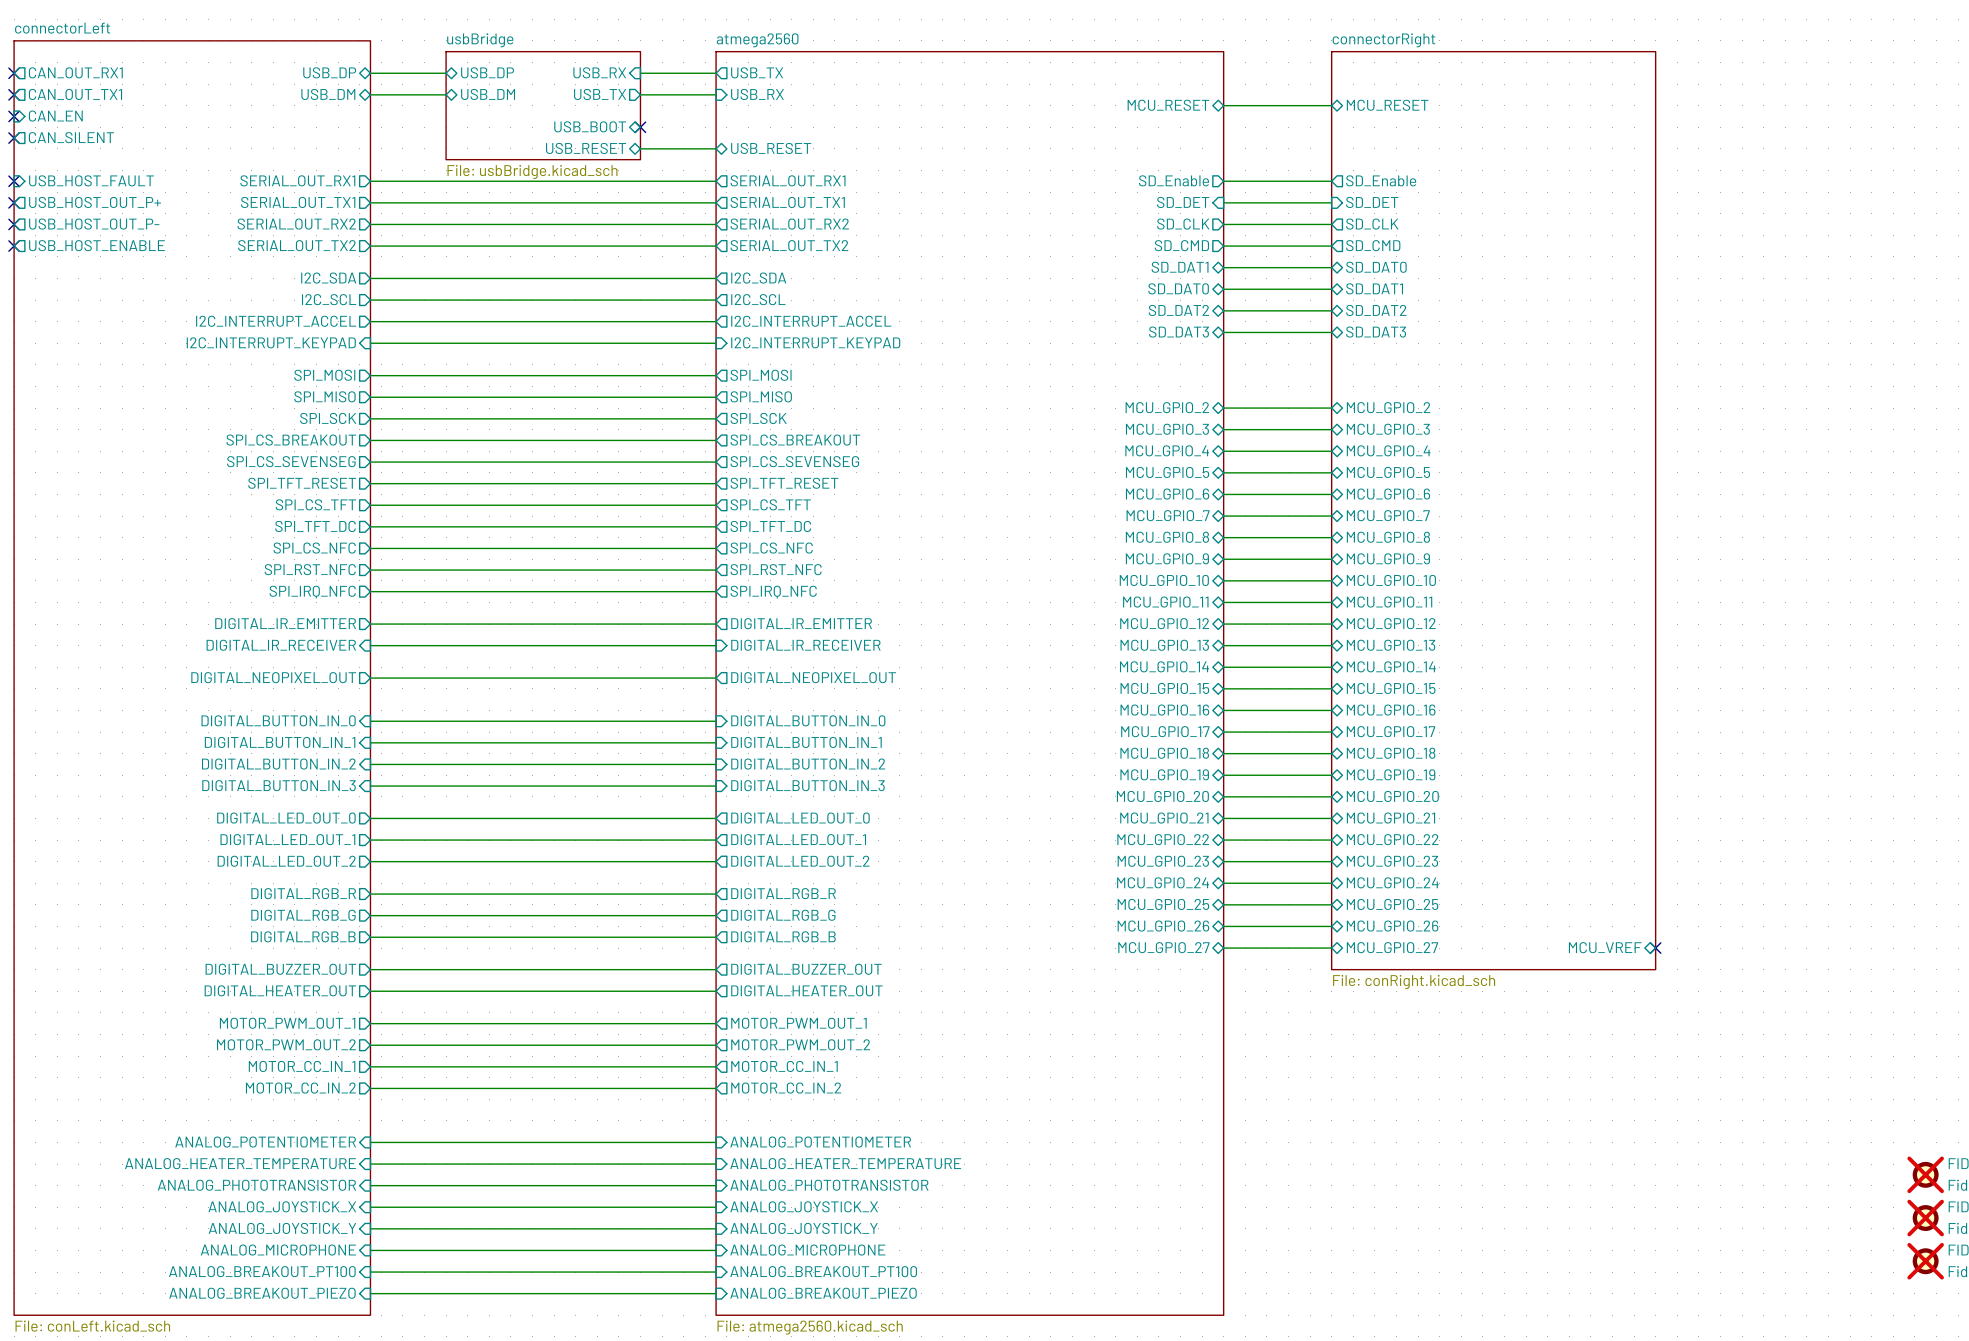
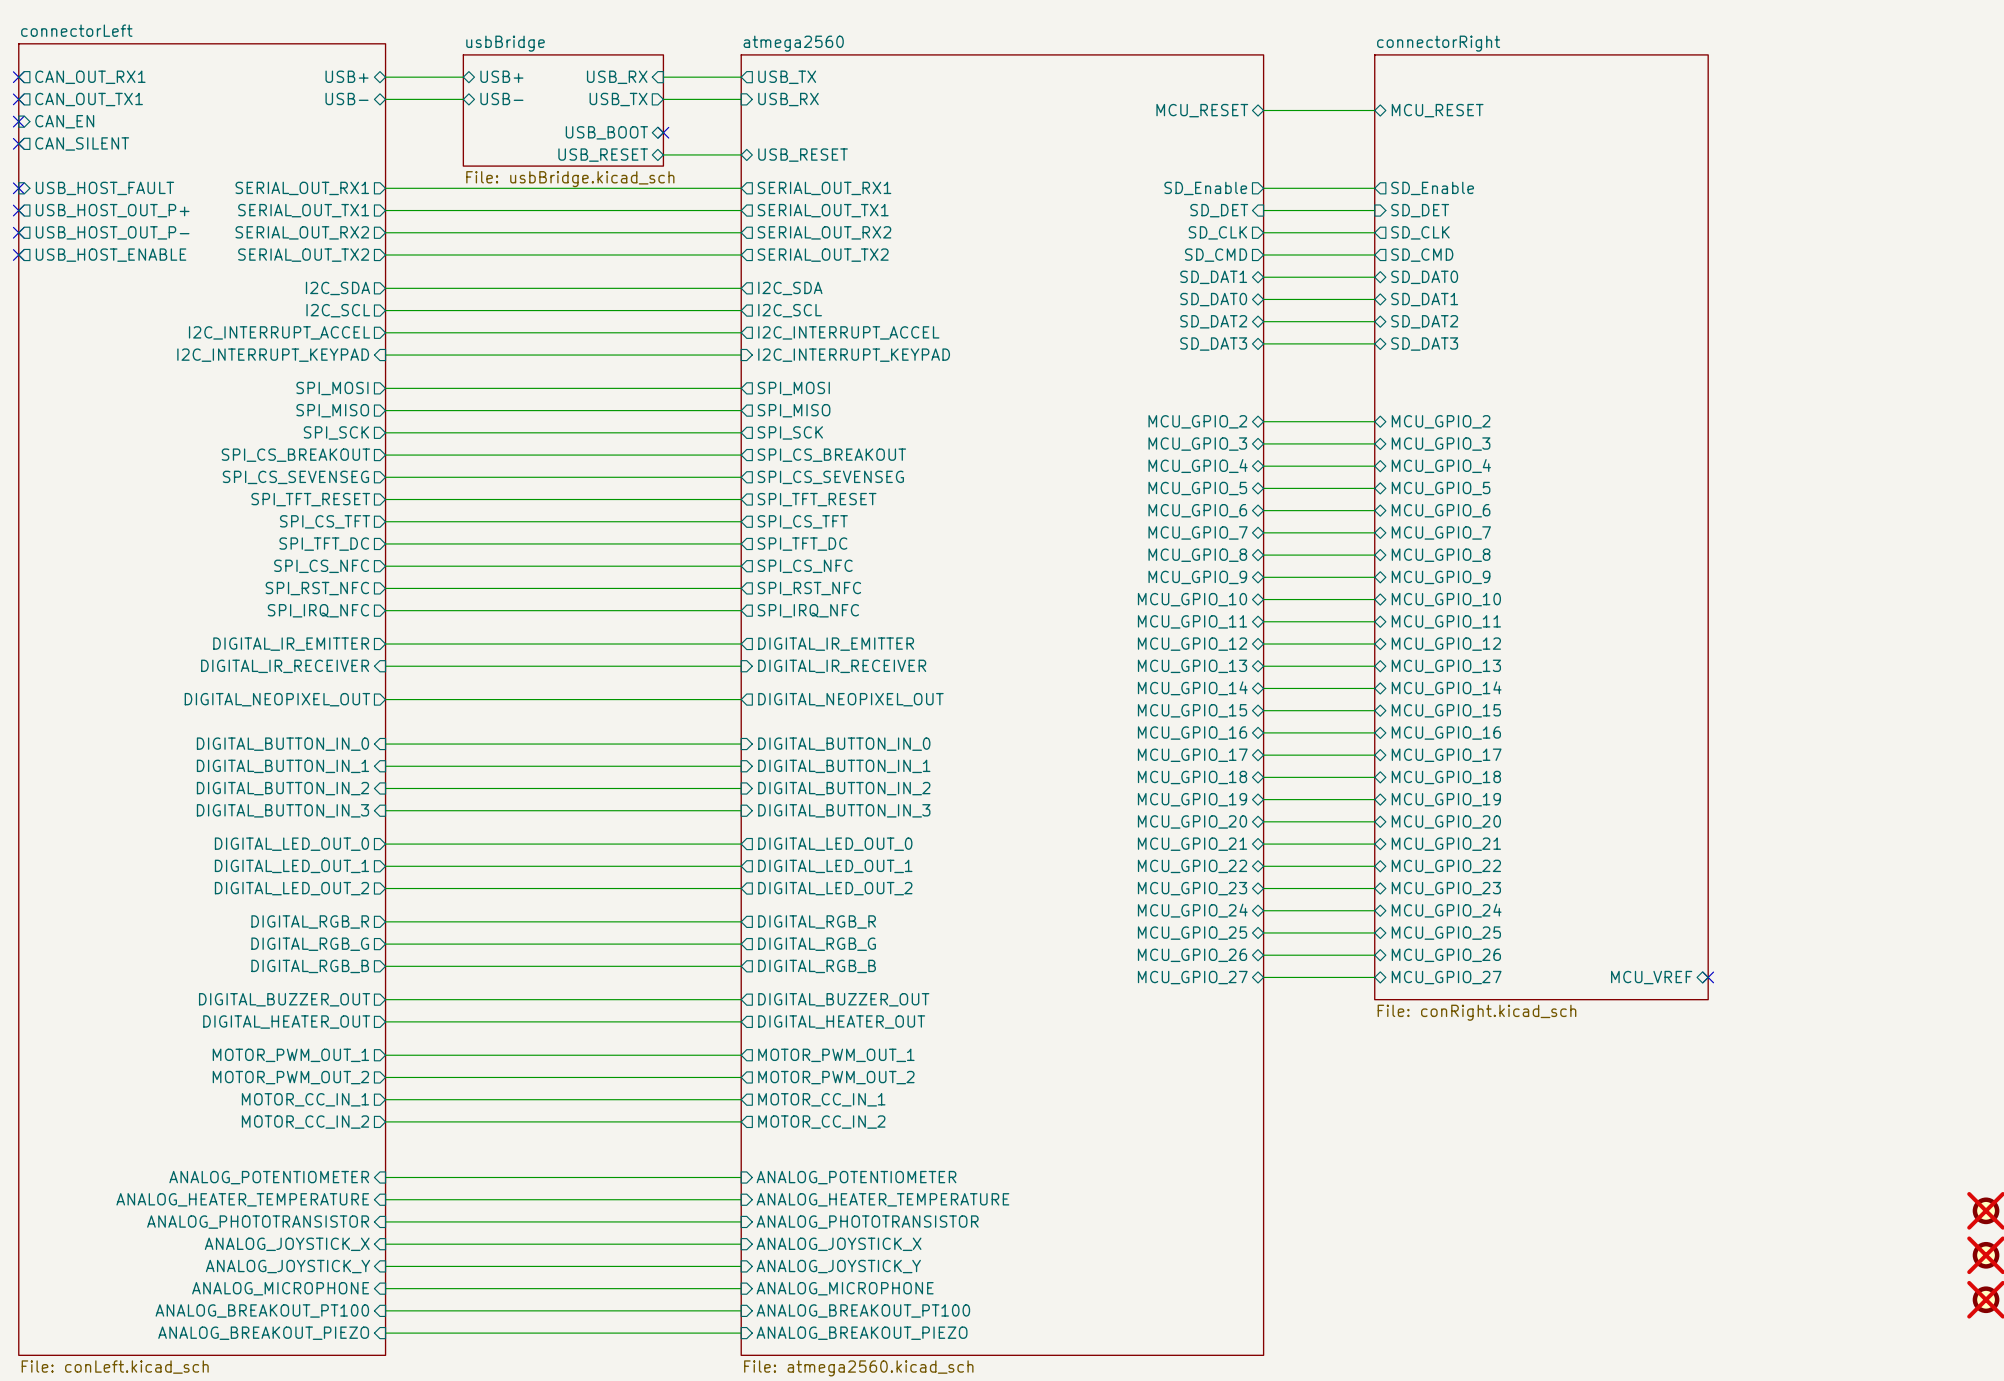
sheet pin: USB_DP (329, 72) -> USB+ (347, 76)
sheet pin: USB_DP (487, 72) -> USB+ (501, 76)
sheet pin: USB_DM (328, 94) -> USB- (347, 98)
sheet pin: USB_DM (488, 94) -> USB- (501, 98)

